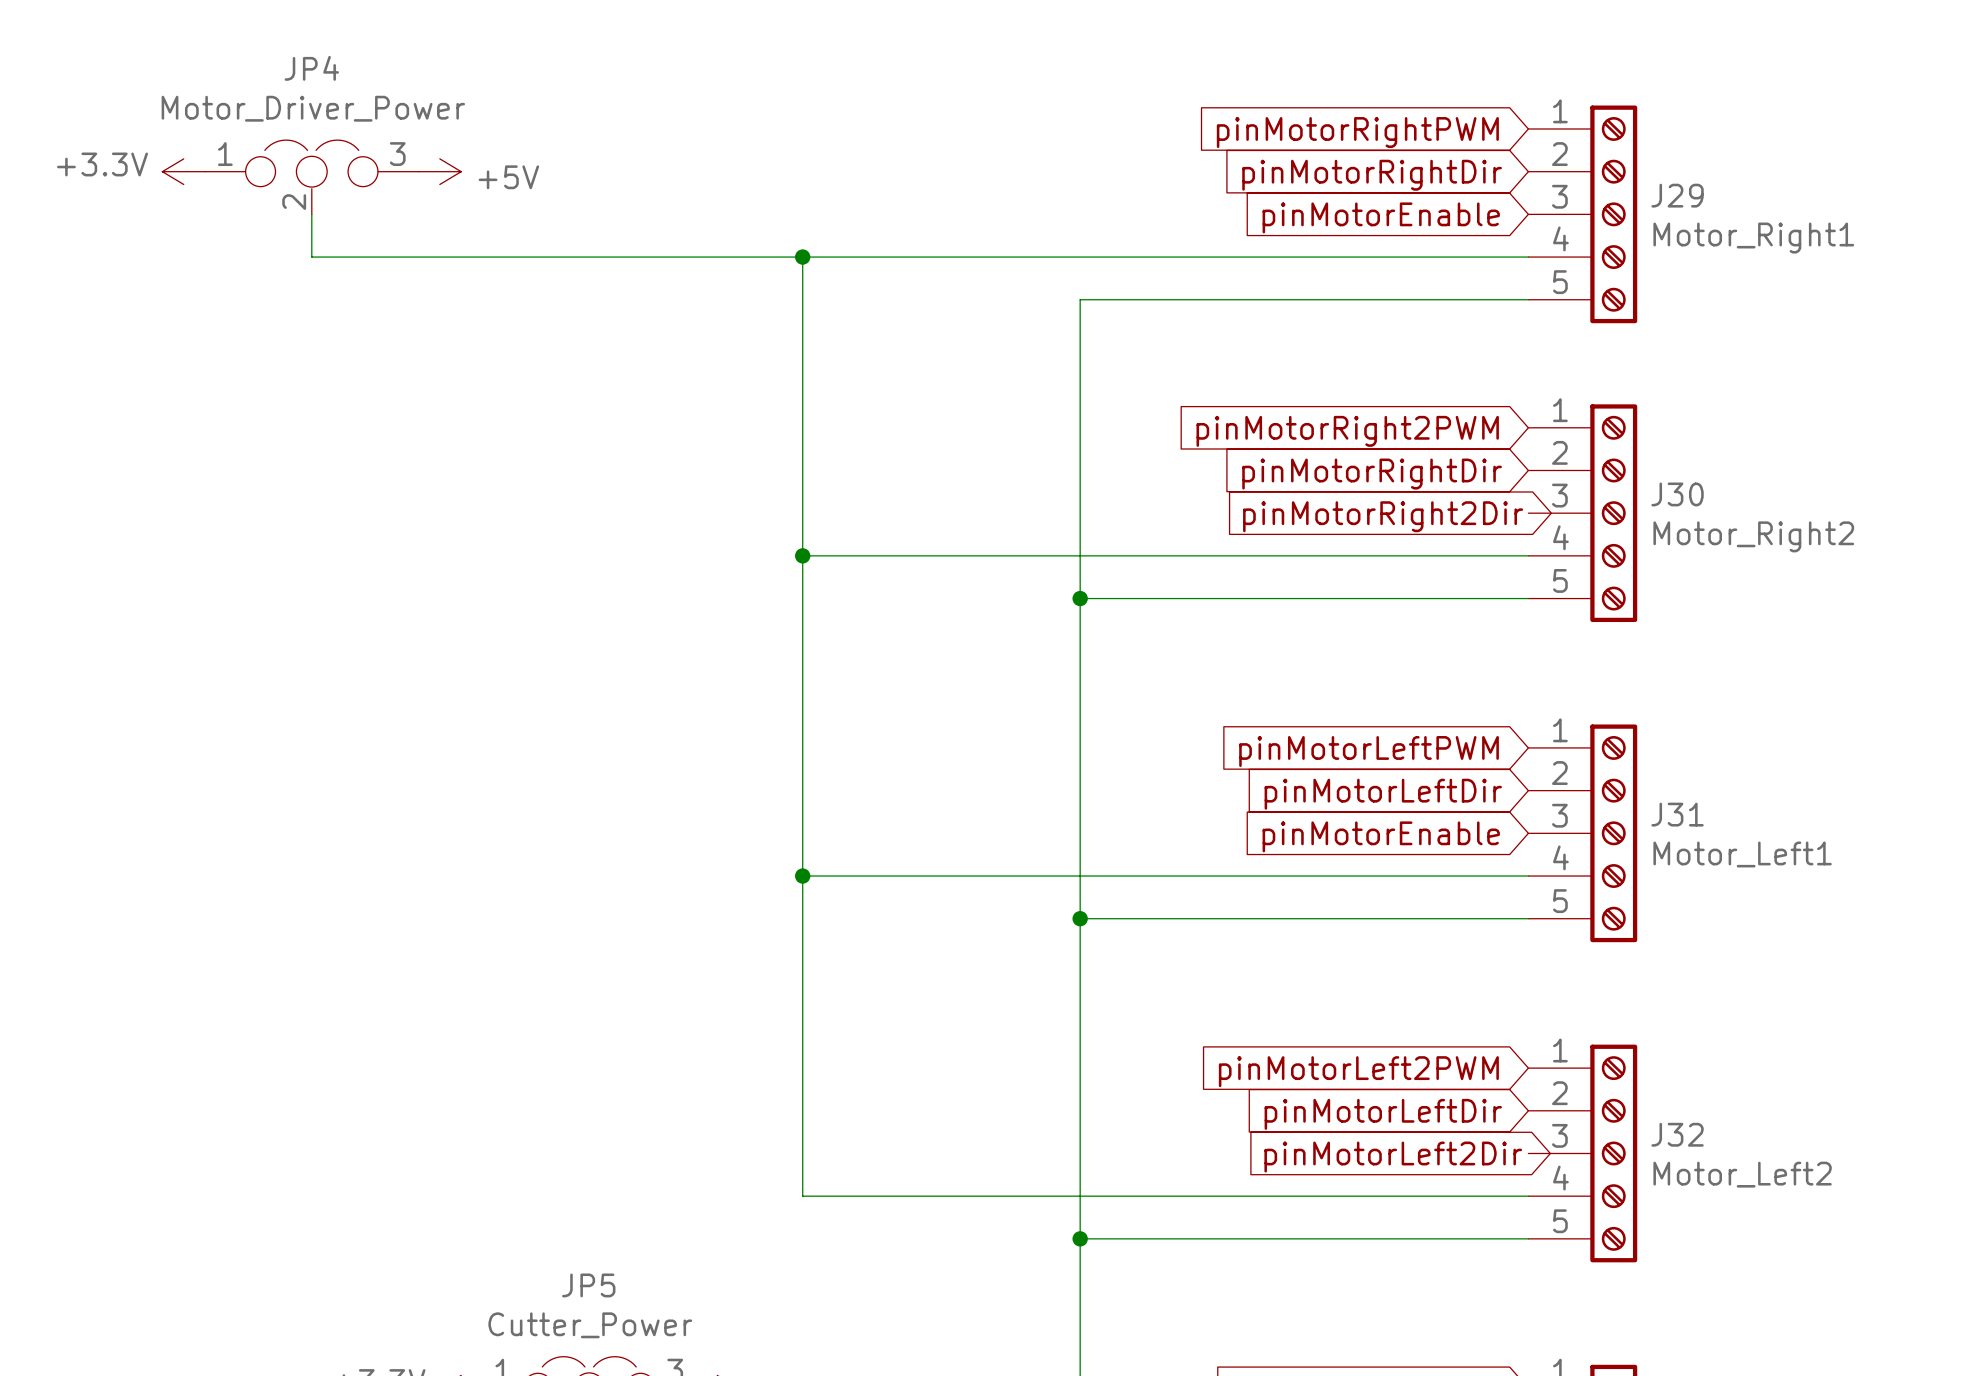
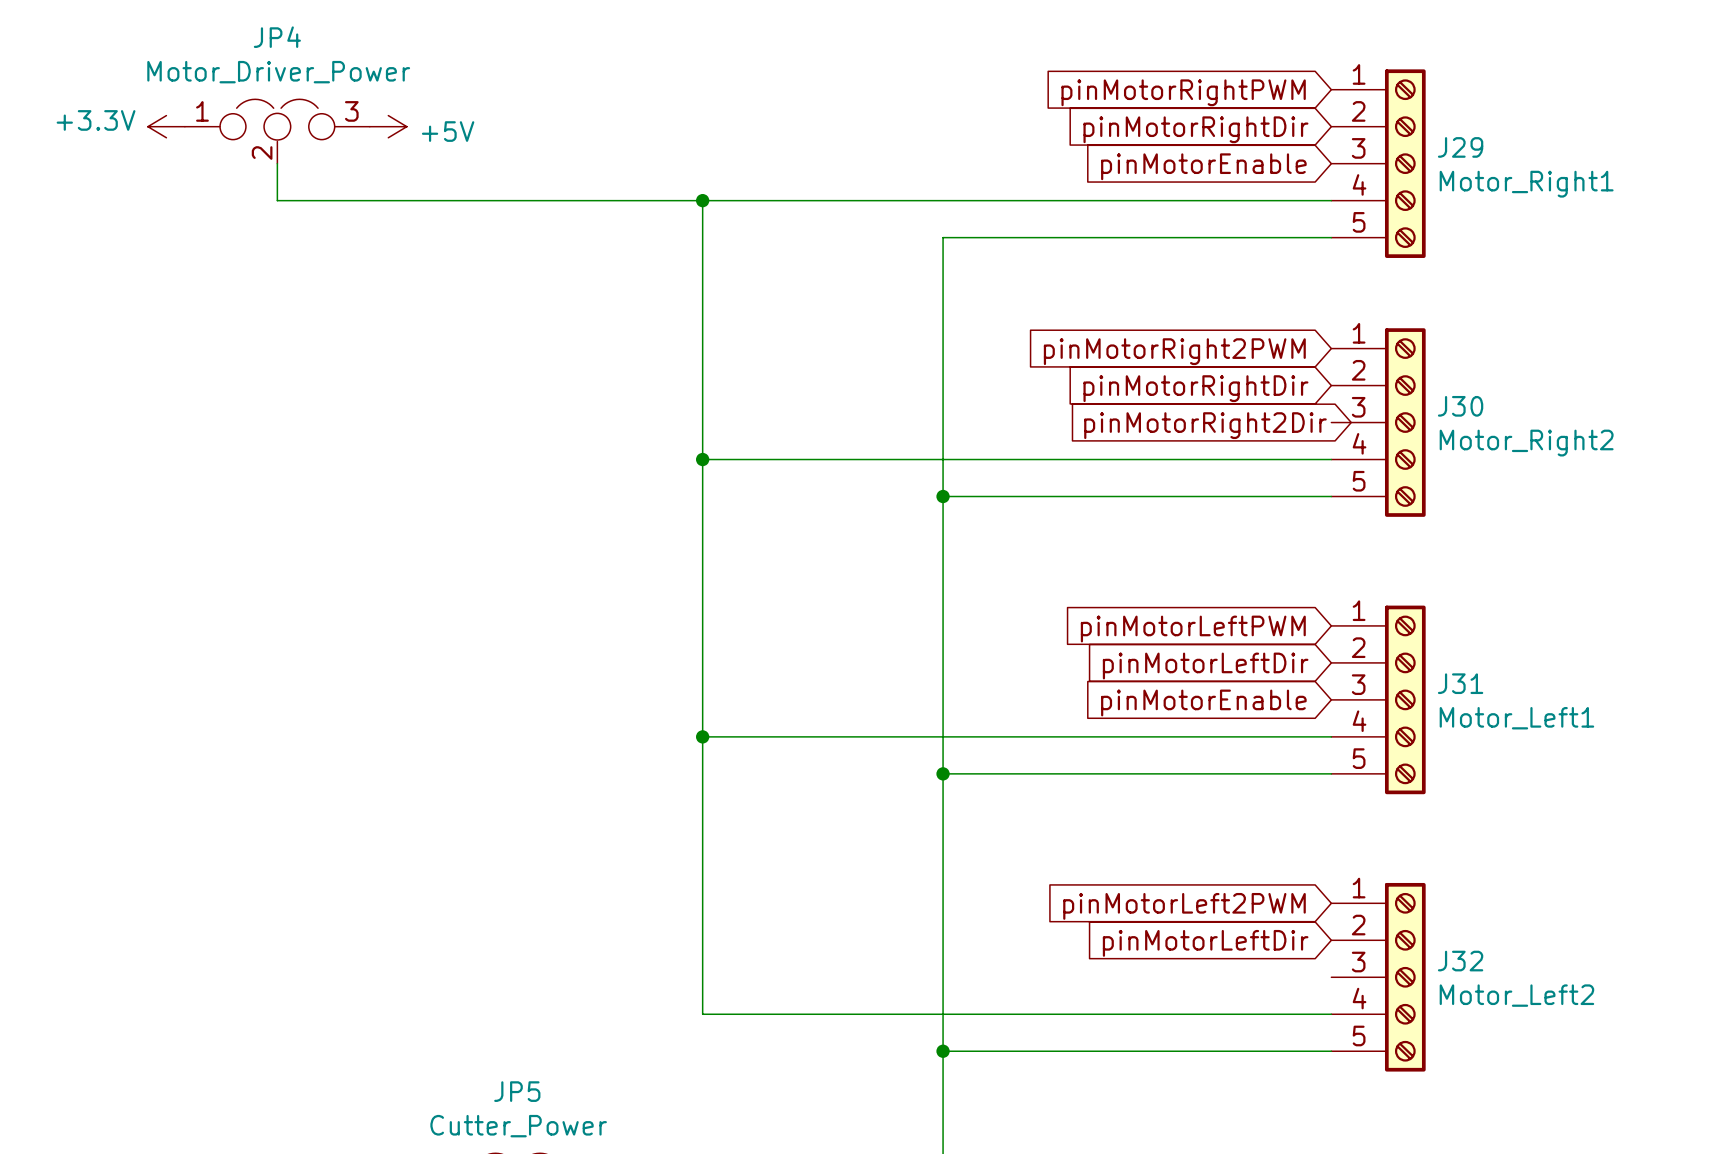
global label: pinMotorLeft2Dir (1393, 1157) -> none

